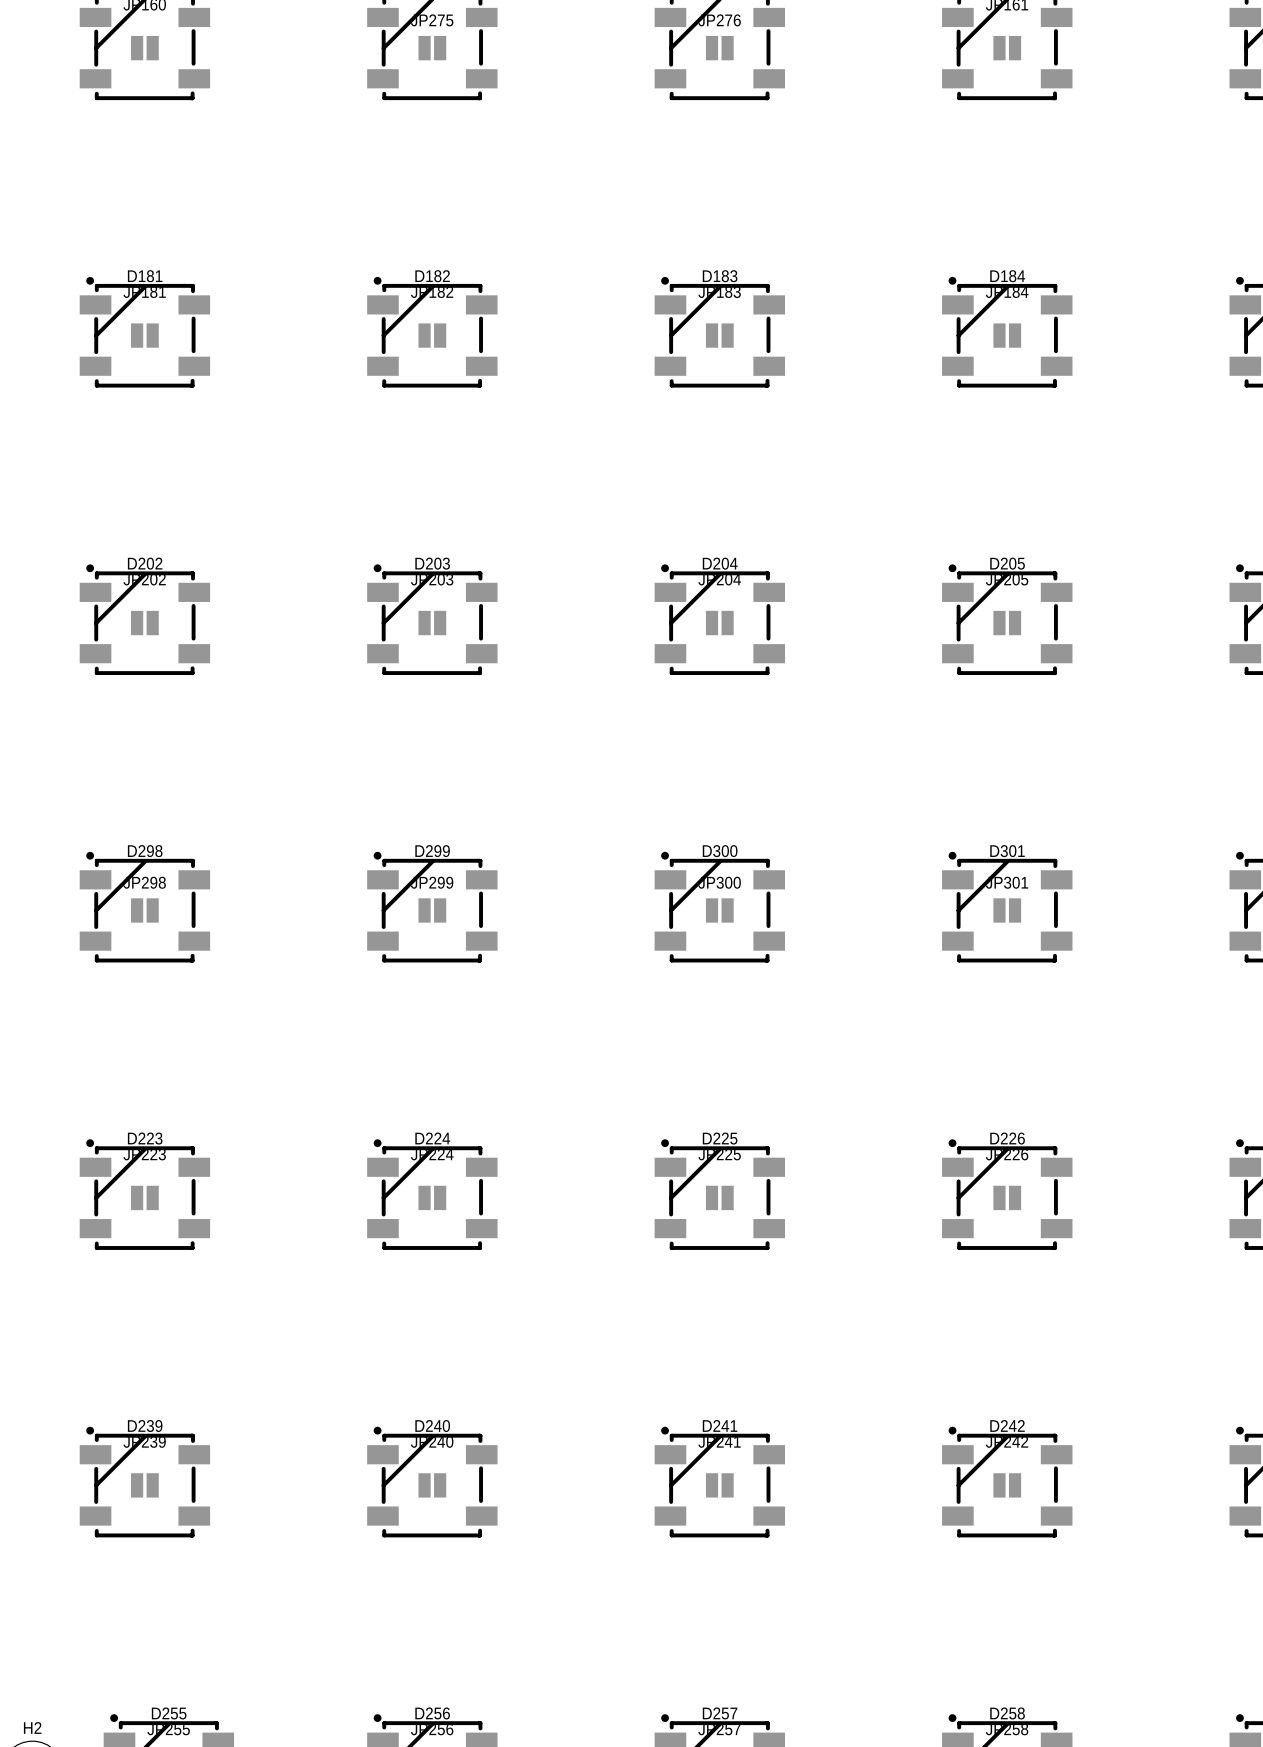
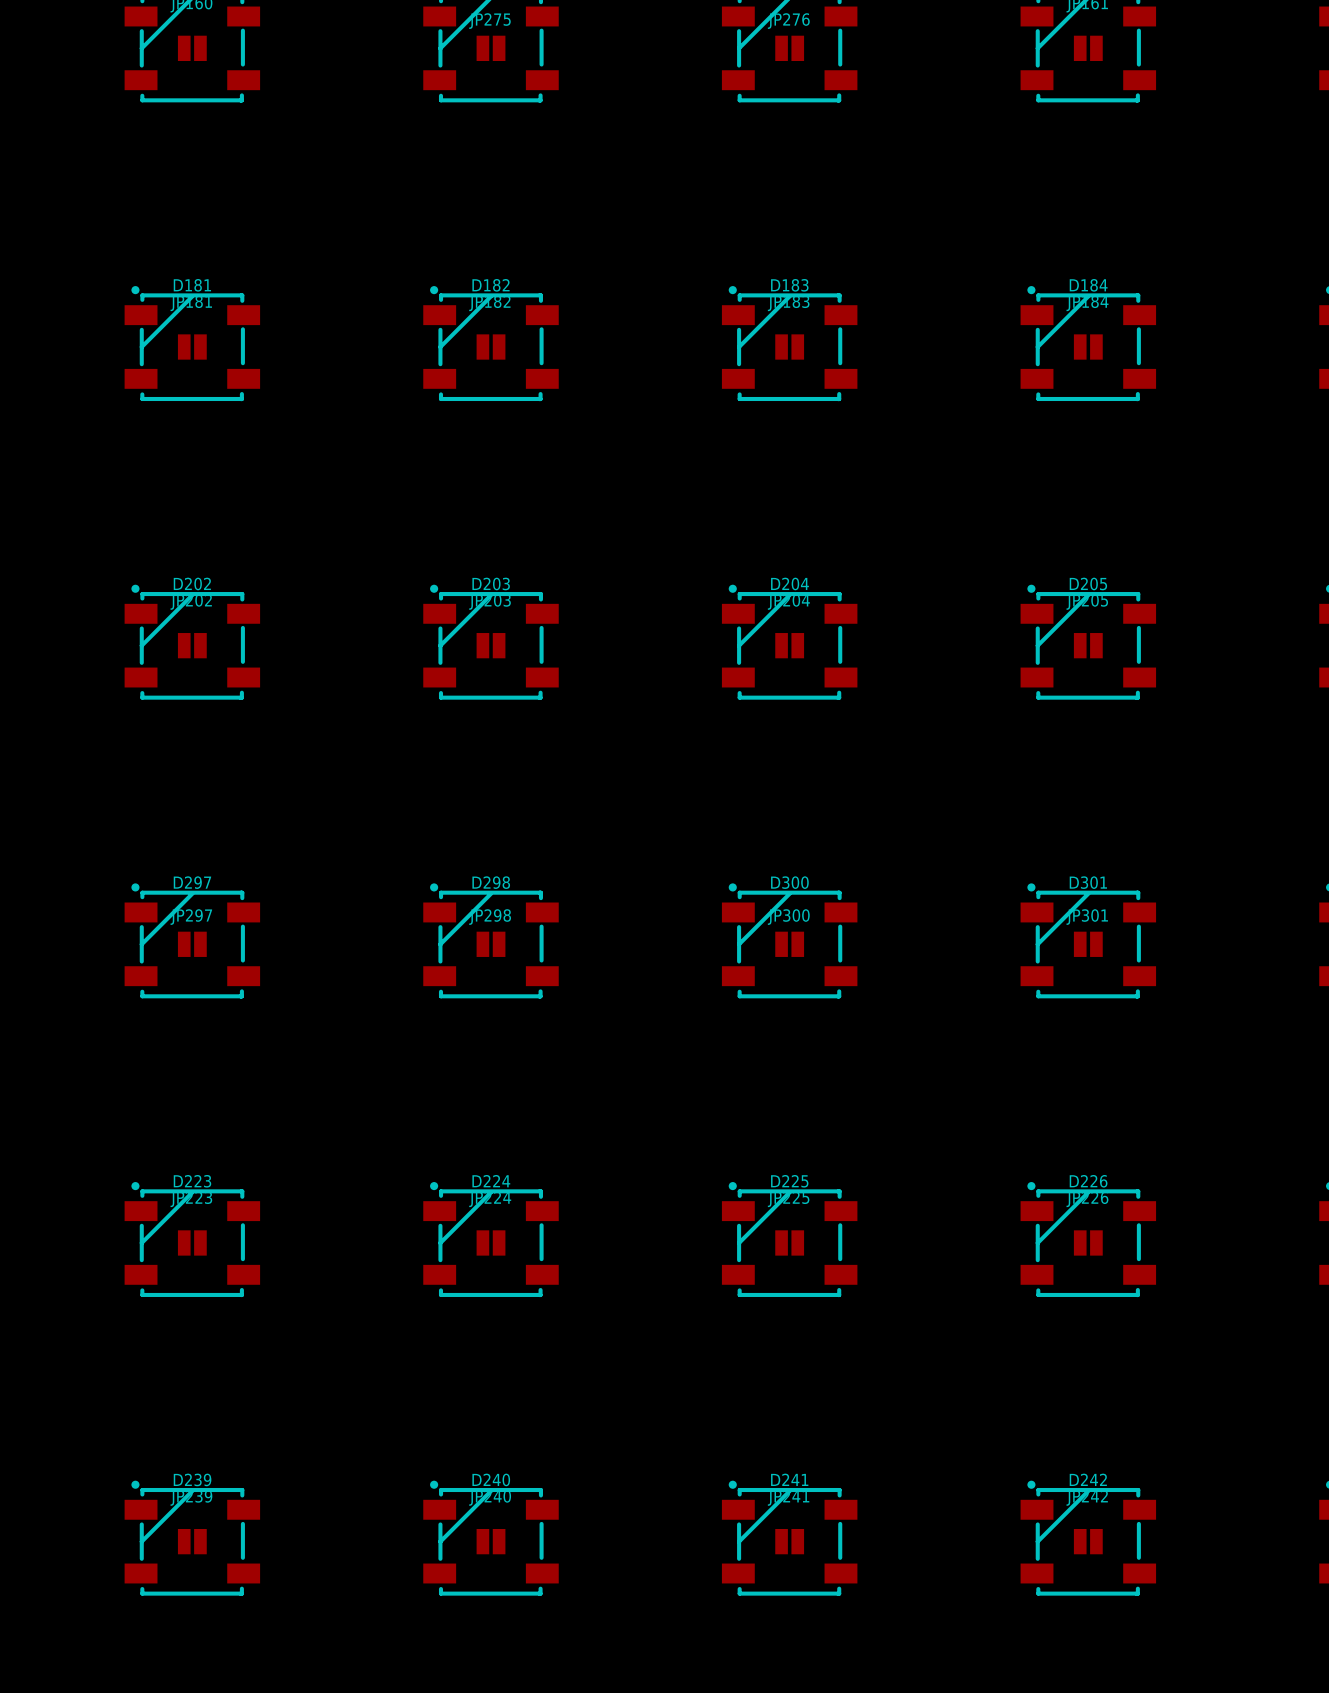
D298 name: D298 (145, 851) -> D297 (192, 882)
D299 name: D299 (432, 851) -> D298 (491, 882)
JP298 name: JP298 (144, 882) -> JP297 (191, 917)
JP299 name: JP299 (432, 882) -> JP298 (490, 917)

